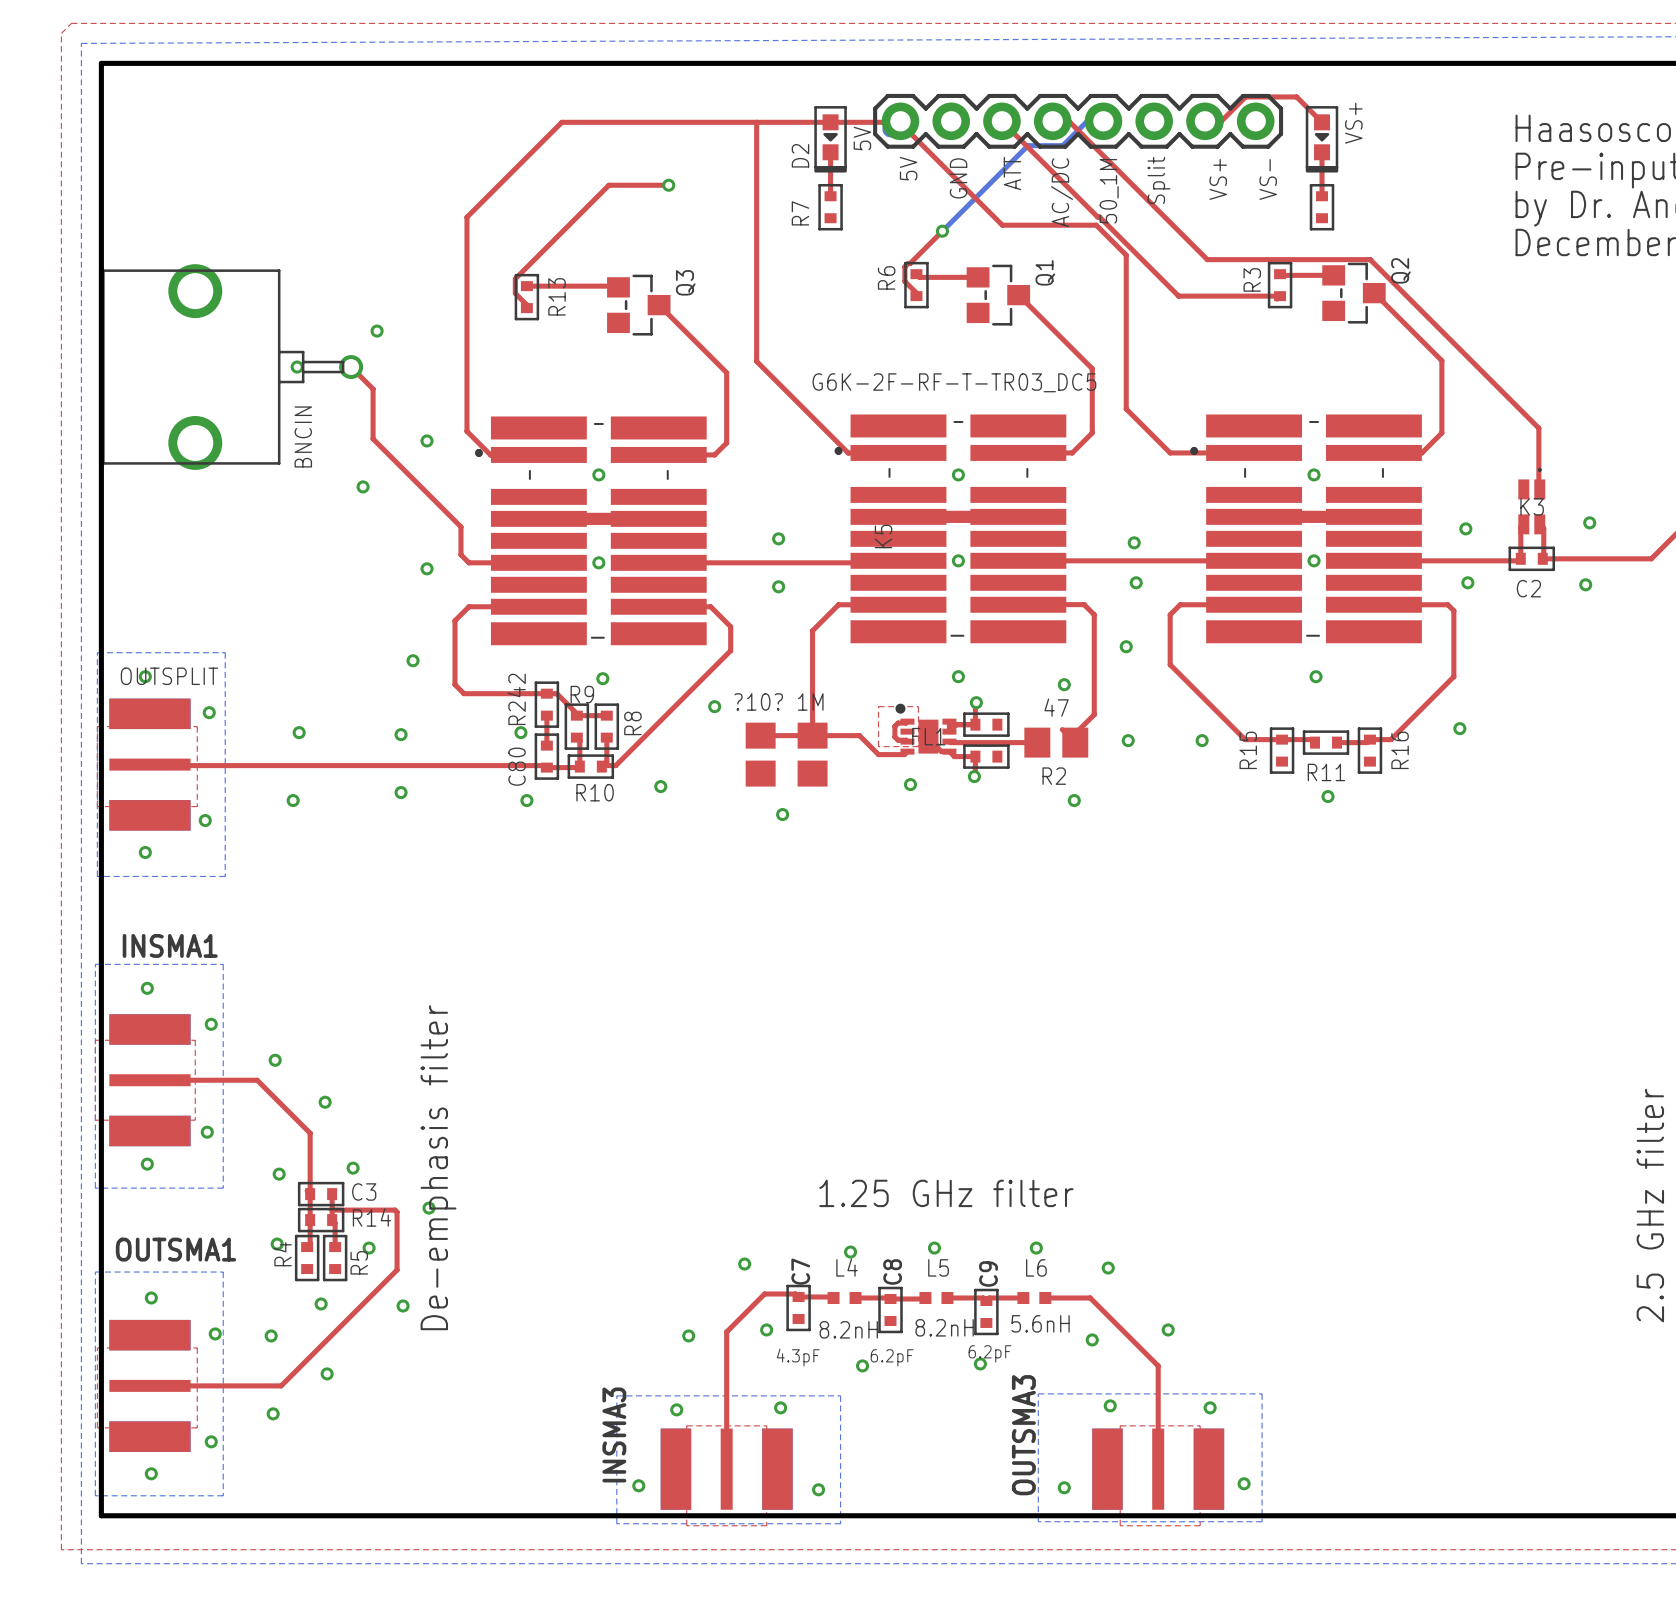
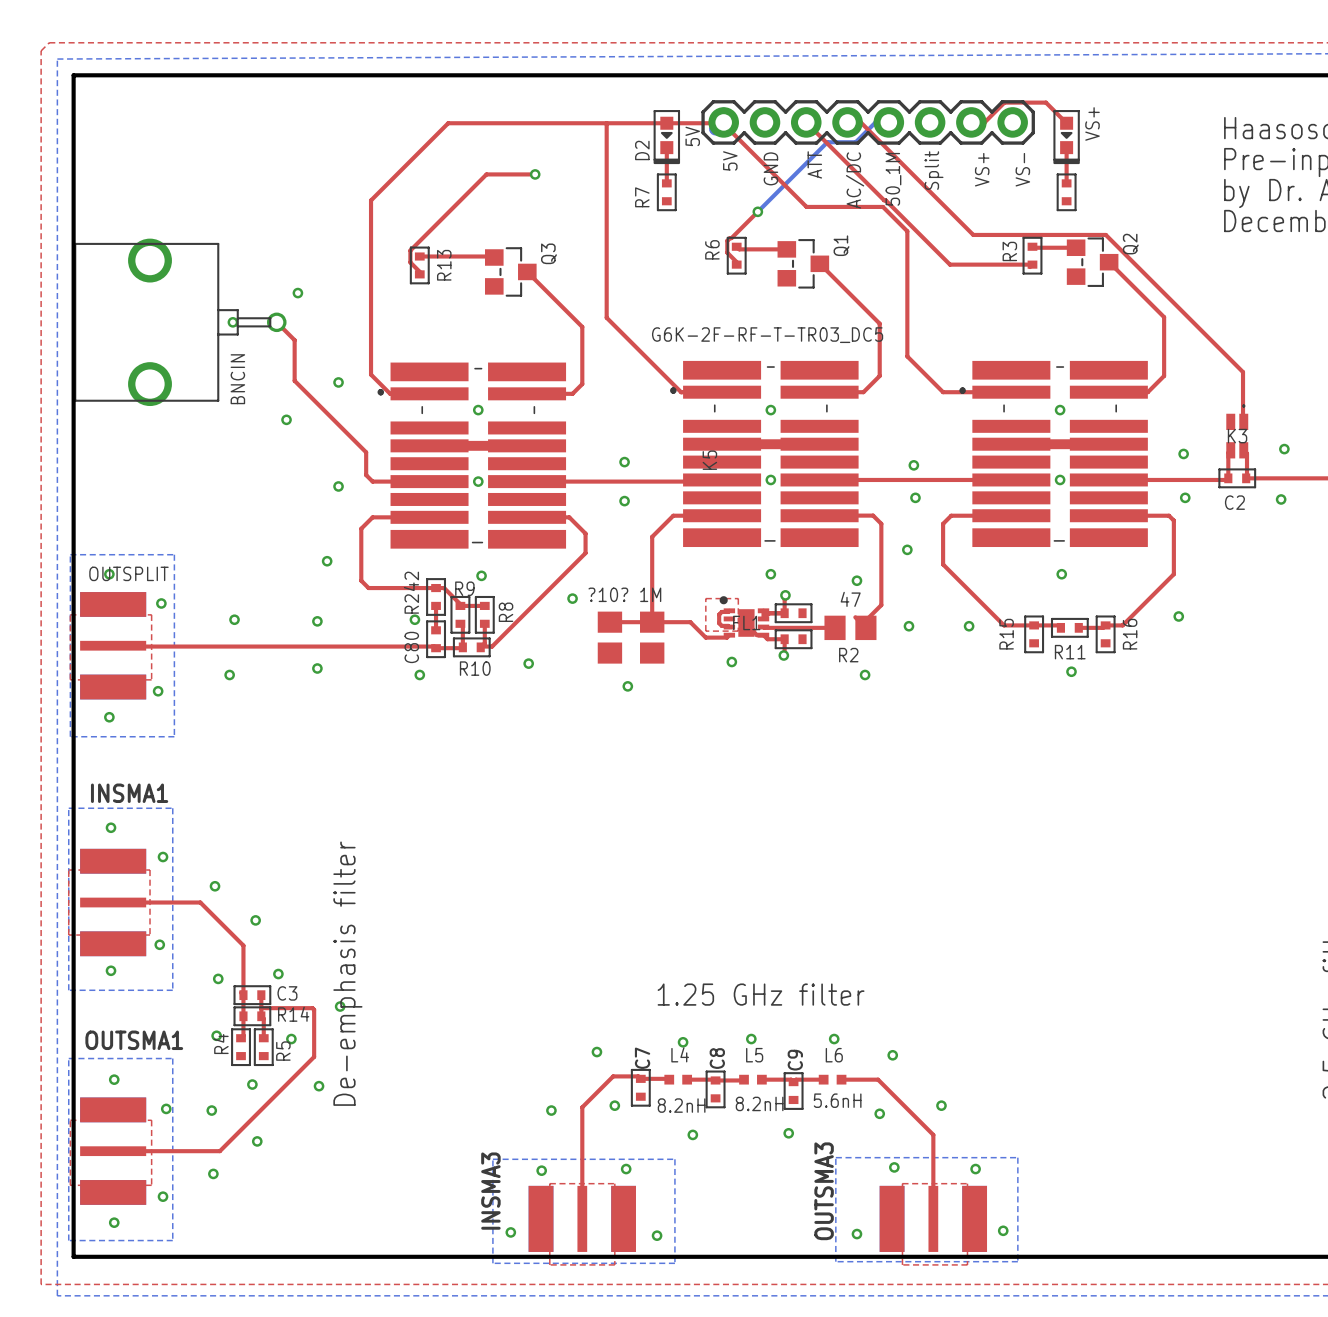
text: 6.2pF (990, 1353) -> none
text: 4.3pF (798, 1357) -> none
text: 6.2pF (892, 1357) -> none

